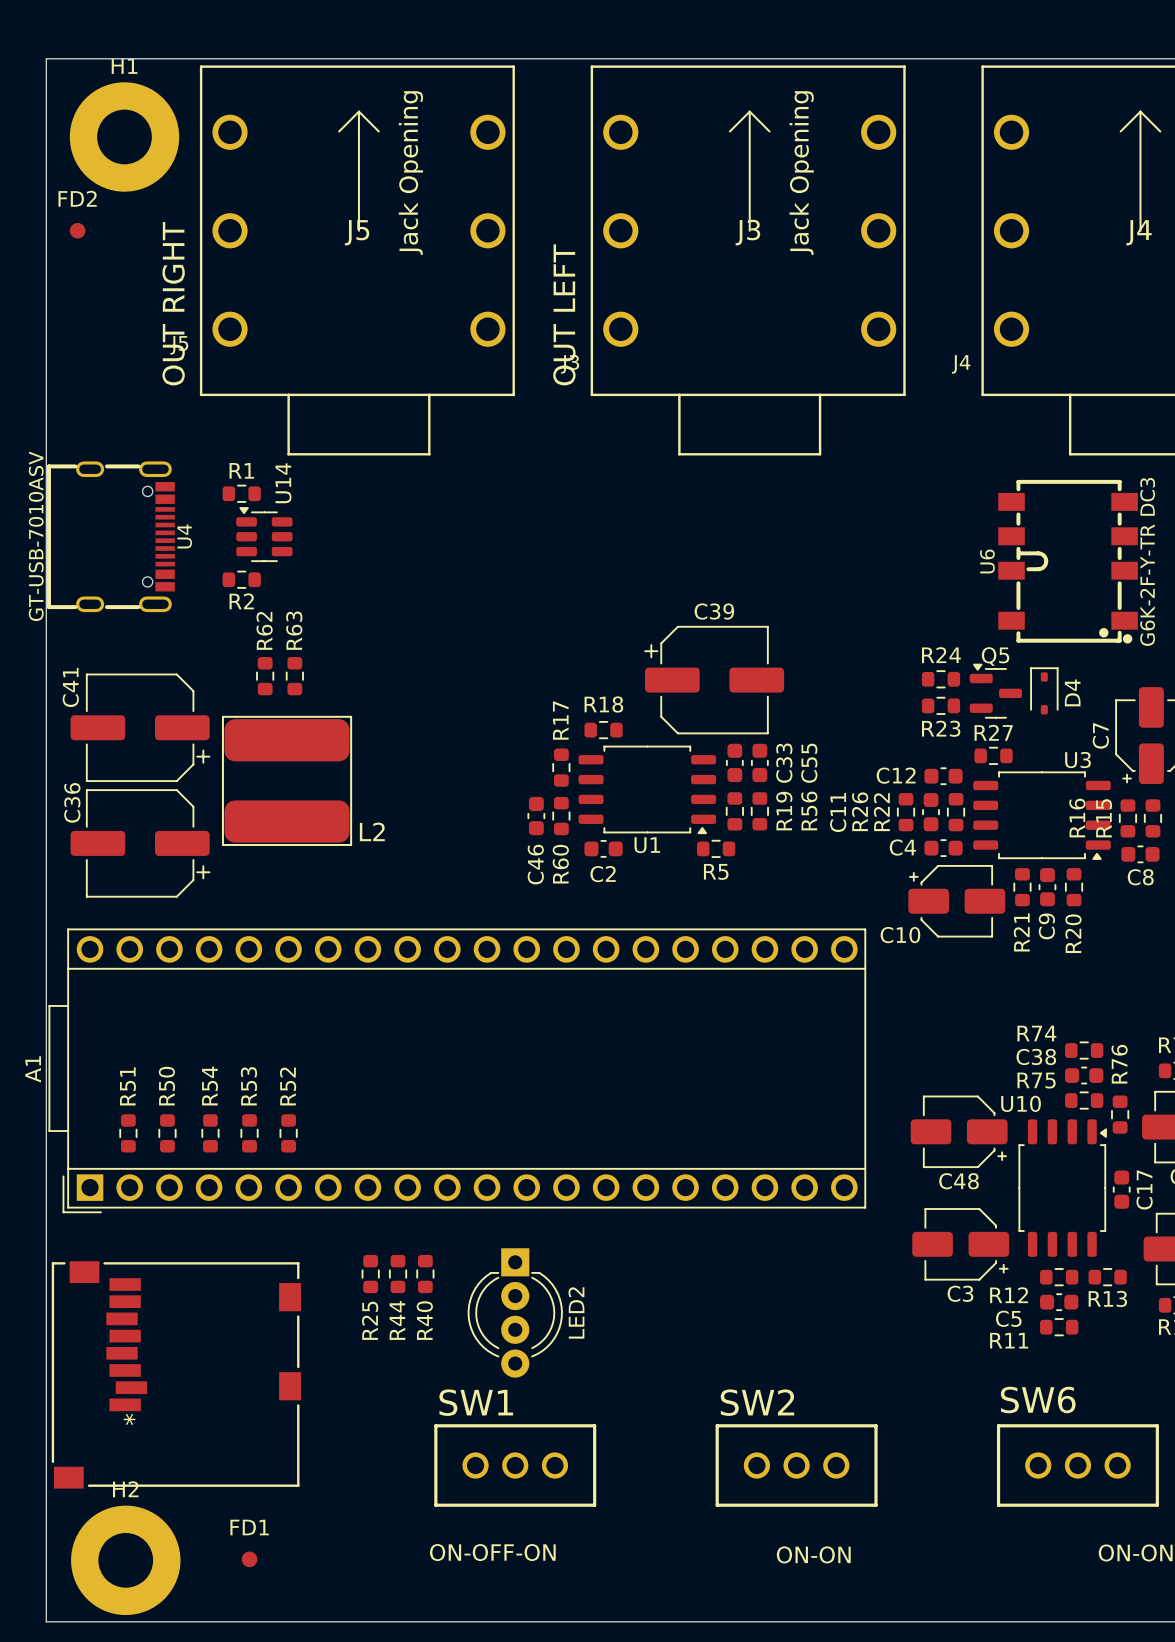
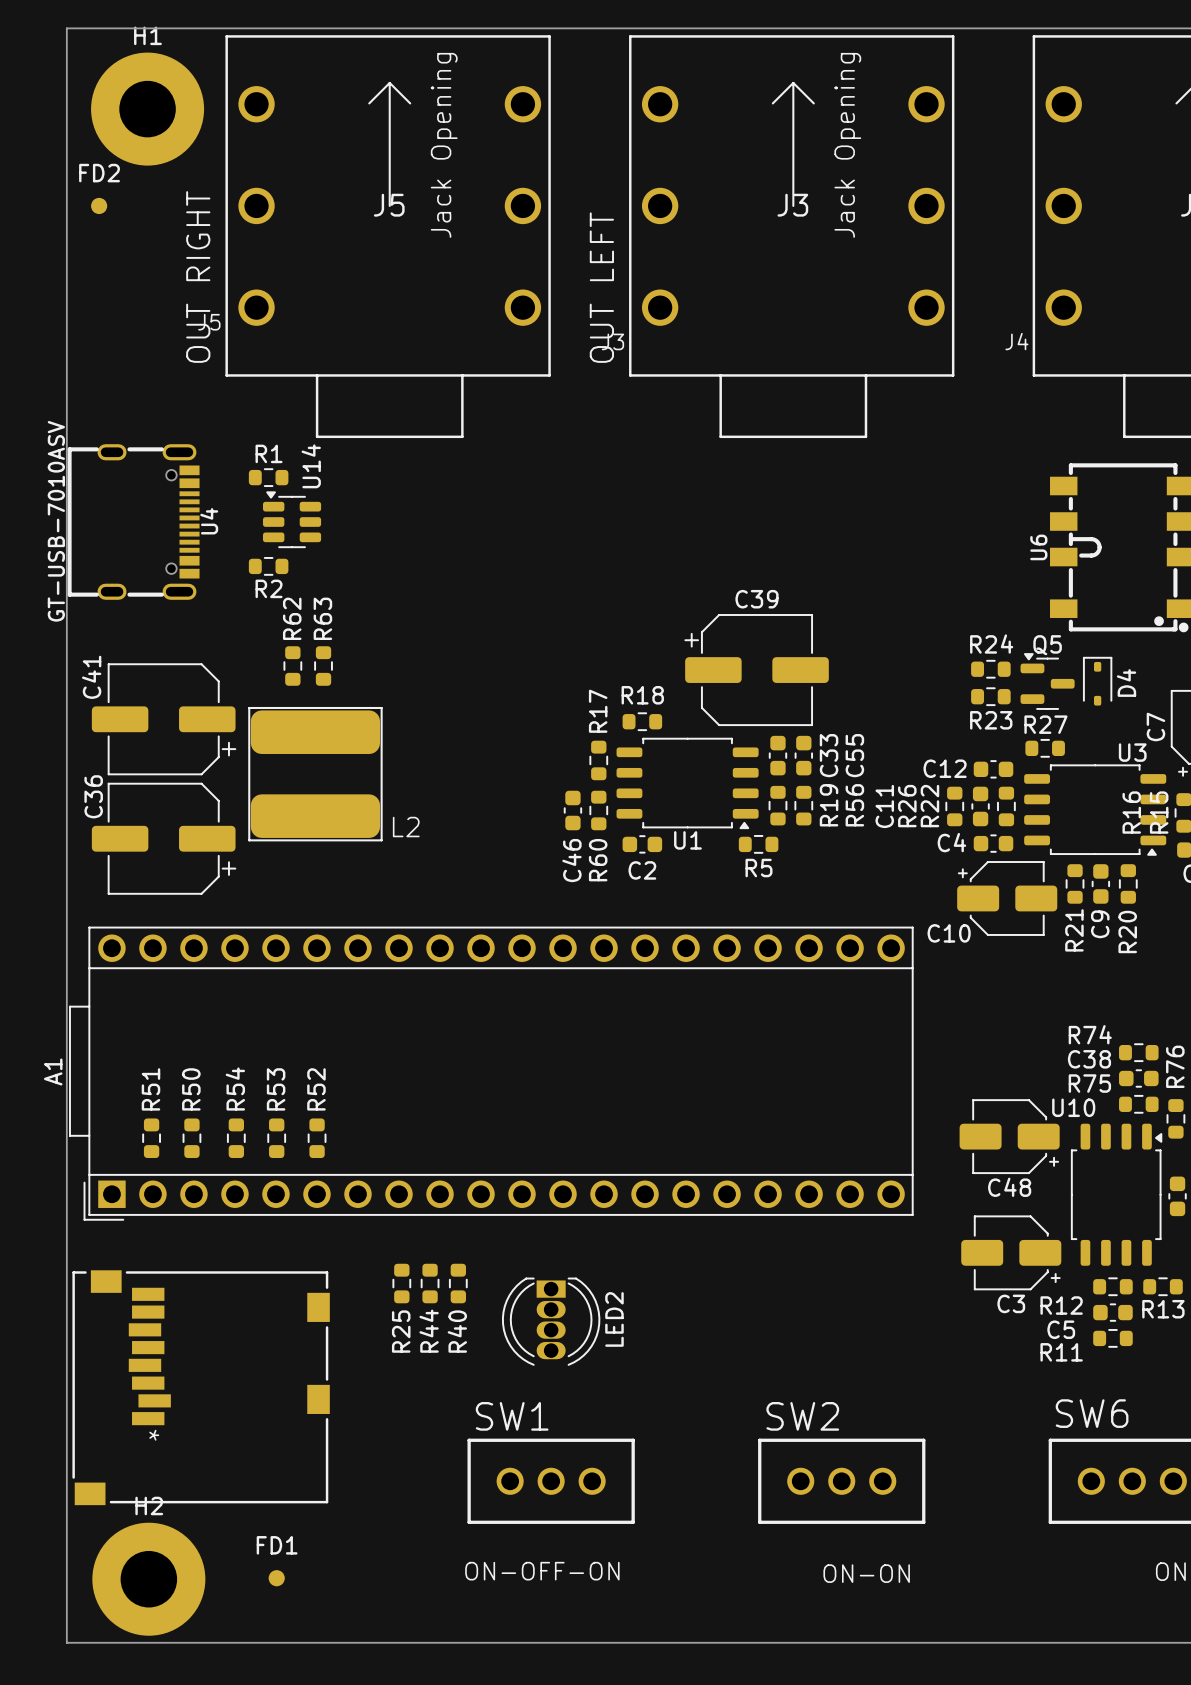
LED2 footprint: [467, 1248, 563, 1378] -> [501, 1277, 601, 1366]

